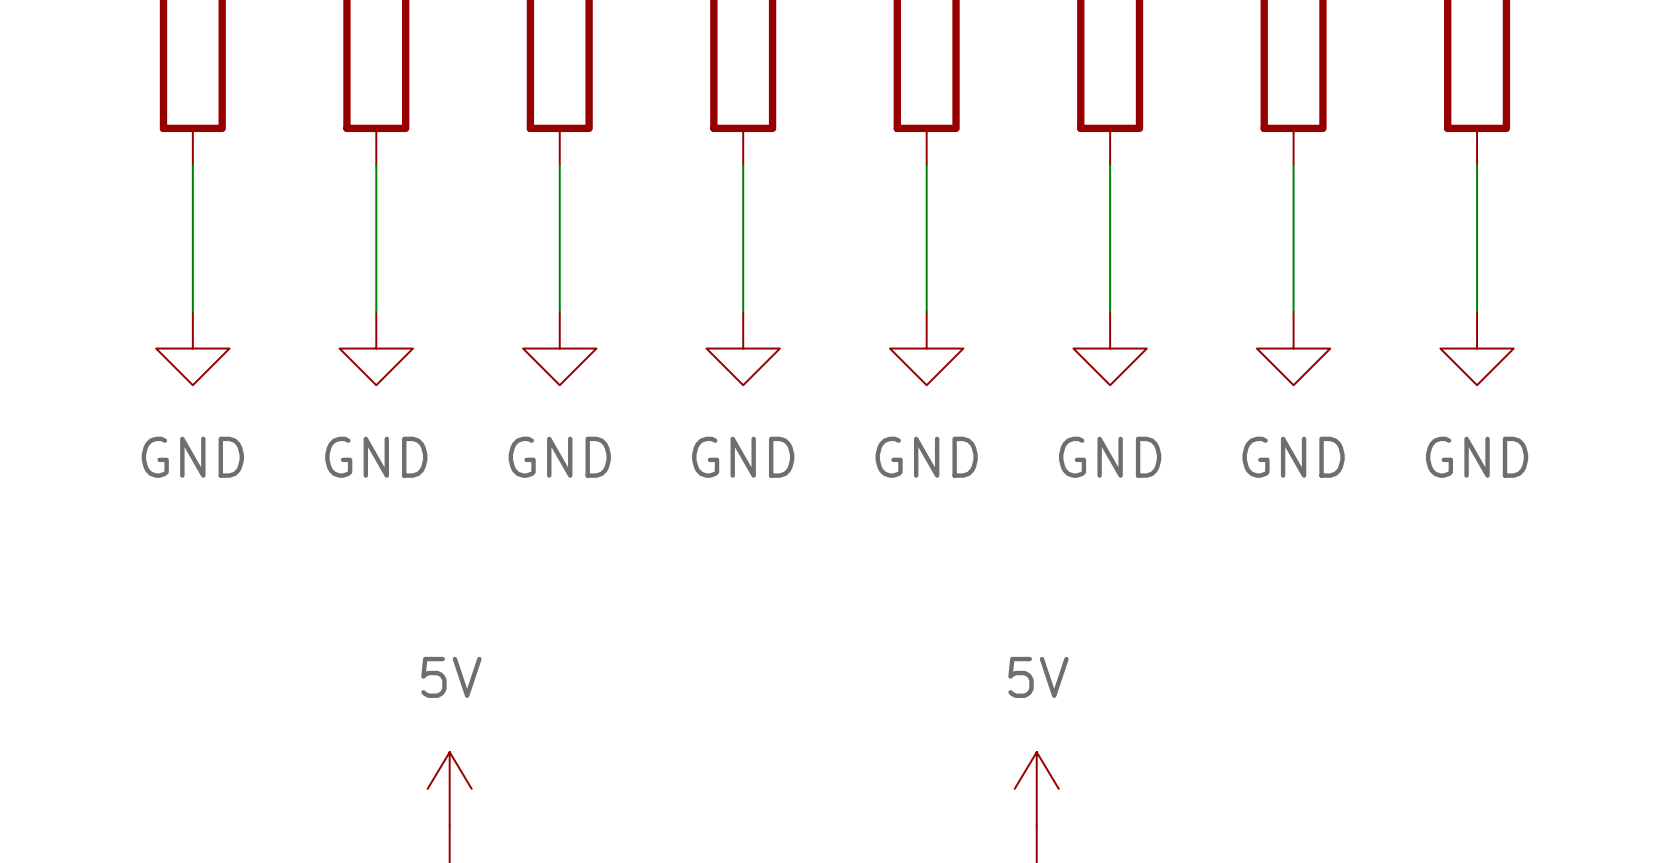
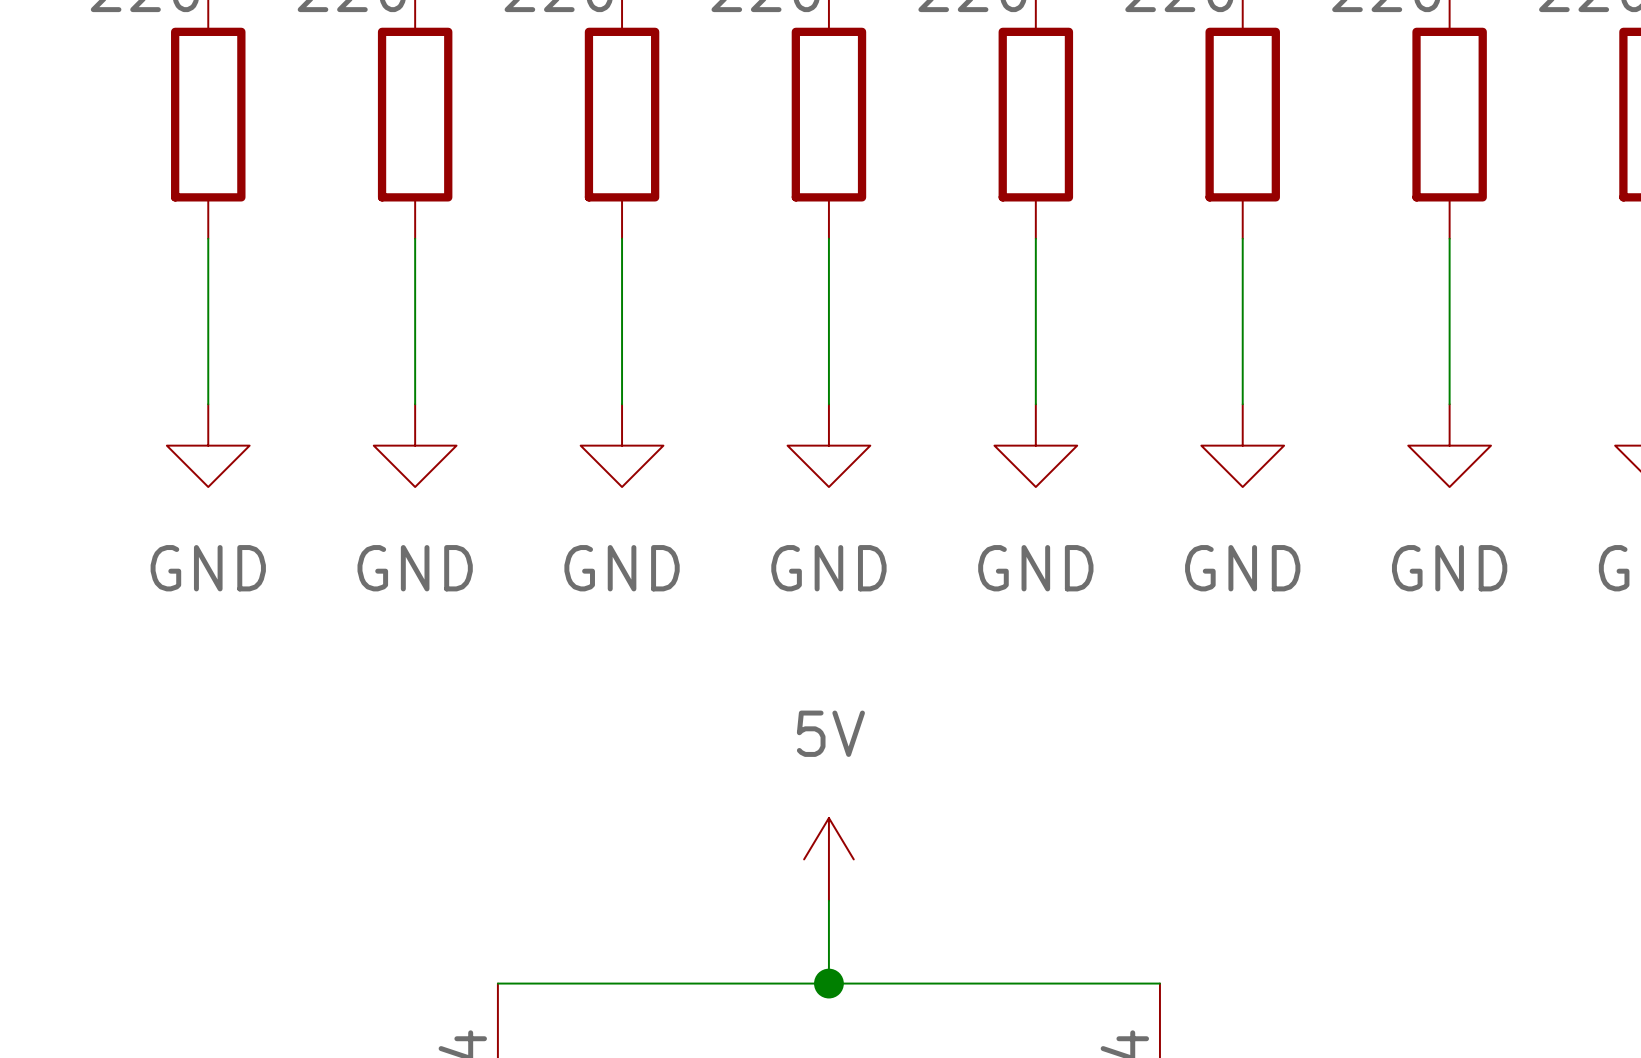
power symbol: none -> 5V (828, 859)
wire: none -> (828, 900) (828, 983)
power symbol: 5V (449, 788) -> none
power symbol: 5V (1036, 788) -> none
wire: none -> (497, 983) (1159, 983)
junction: none -> (828, 983)

